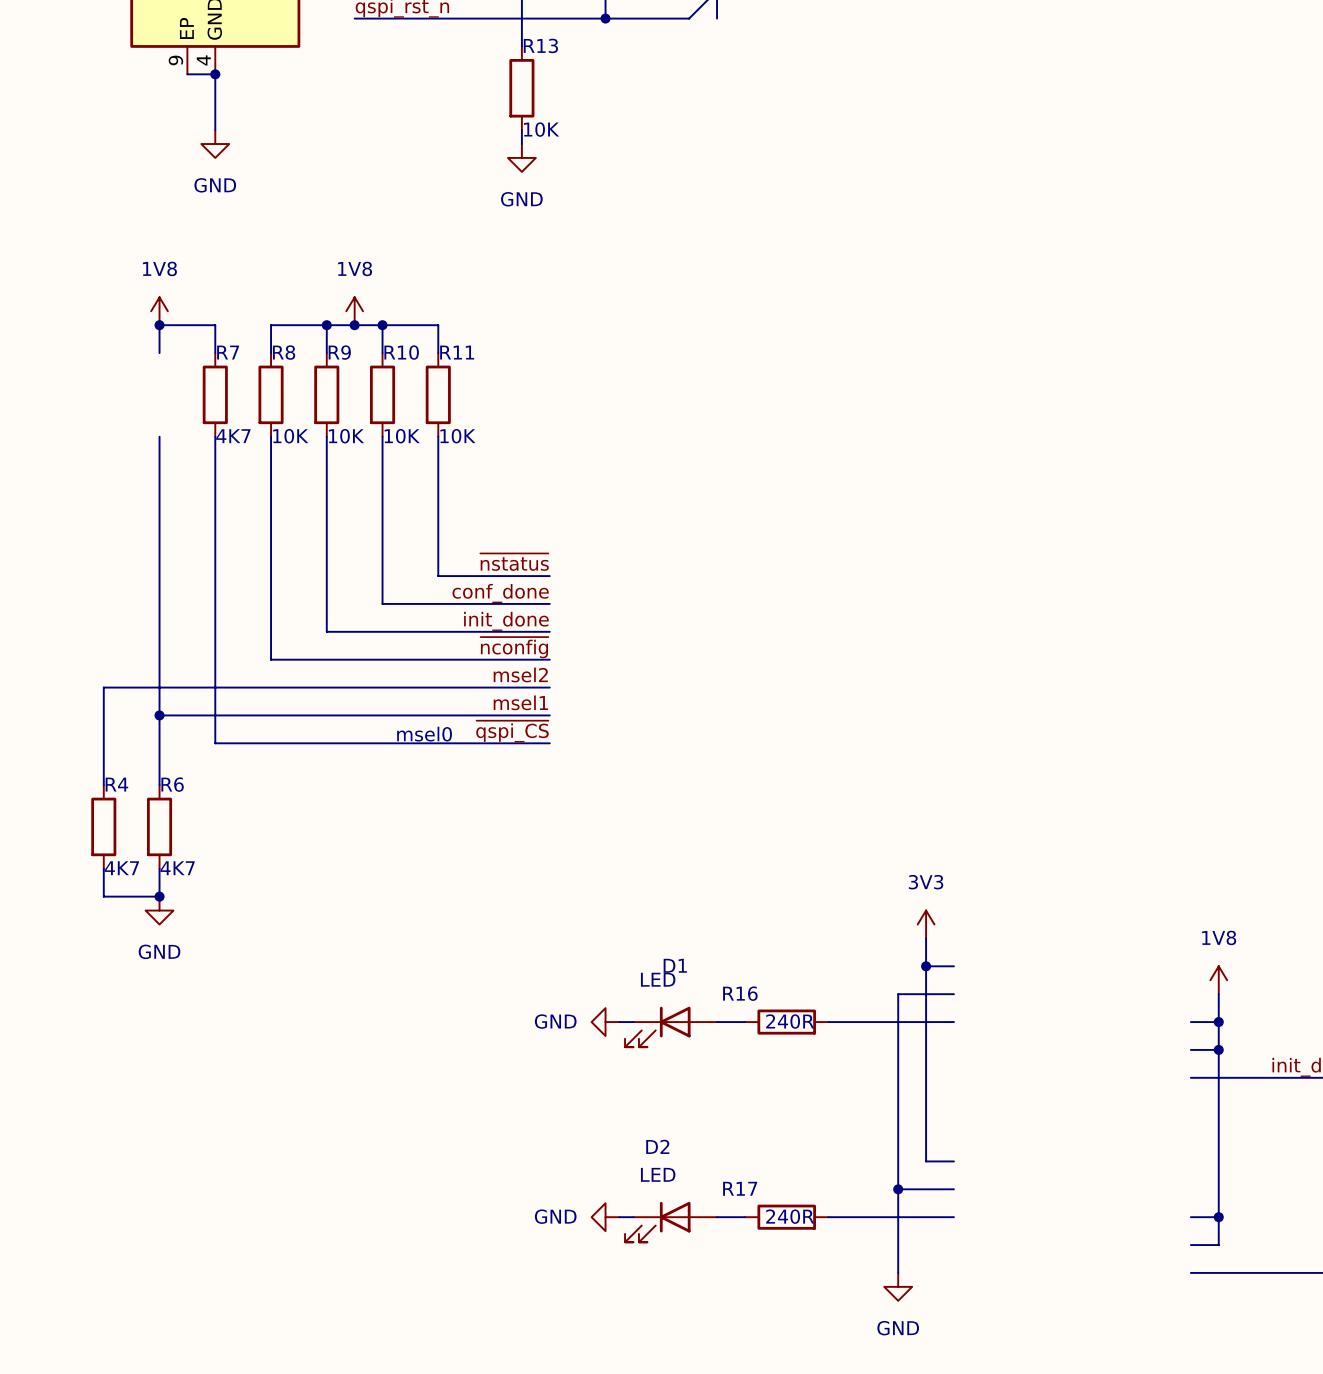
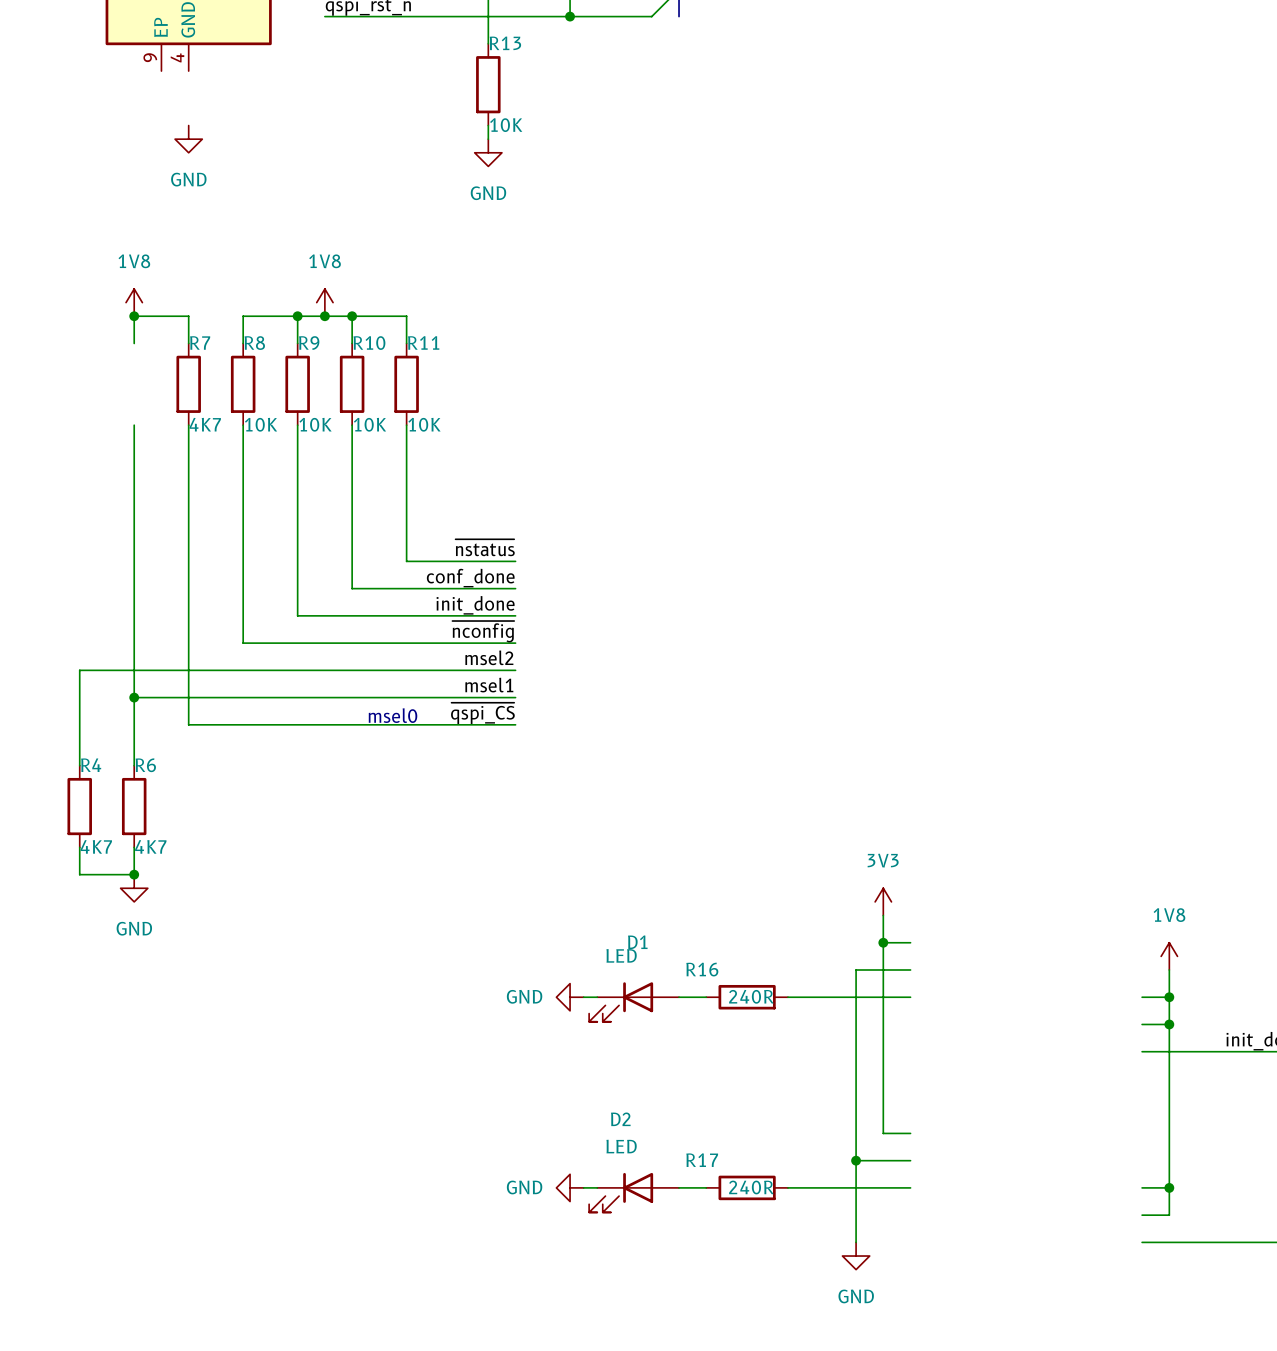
wire: (187, 74) (215, 74) (215, 130) -> none
junction: (215, 74) -> none

